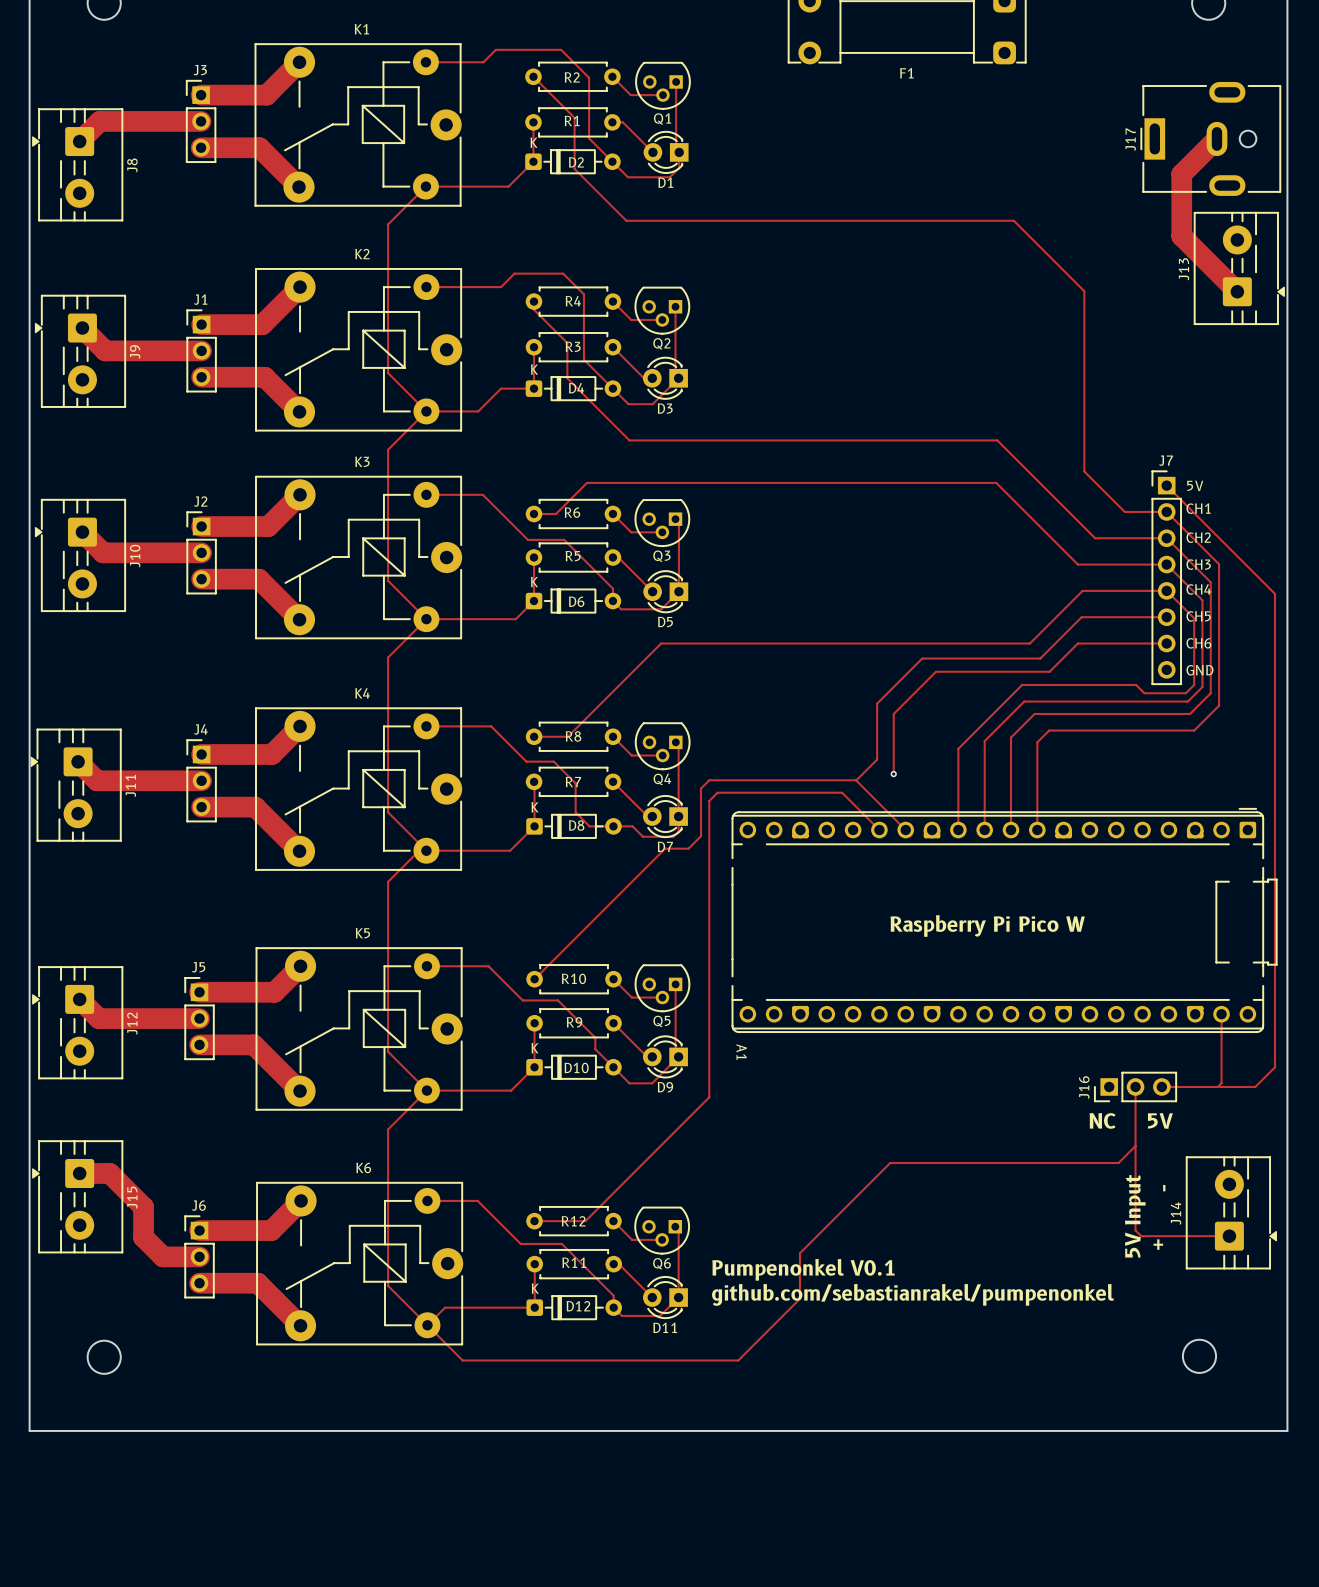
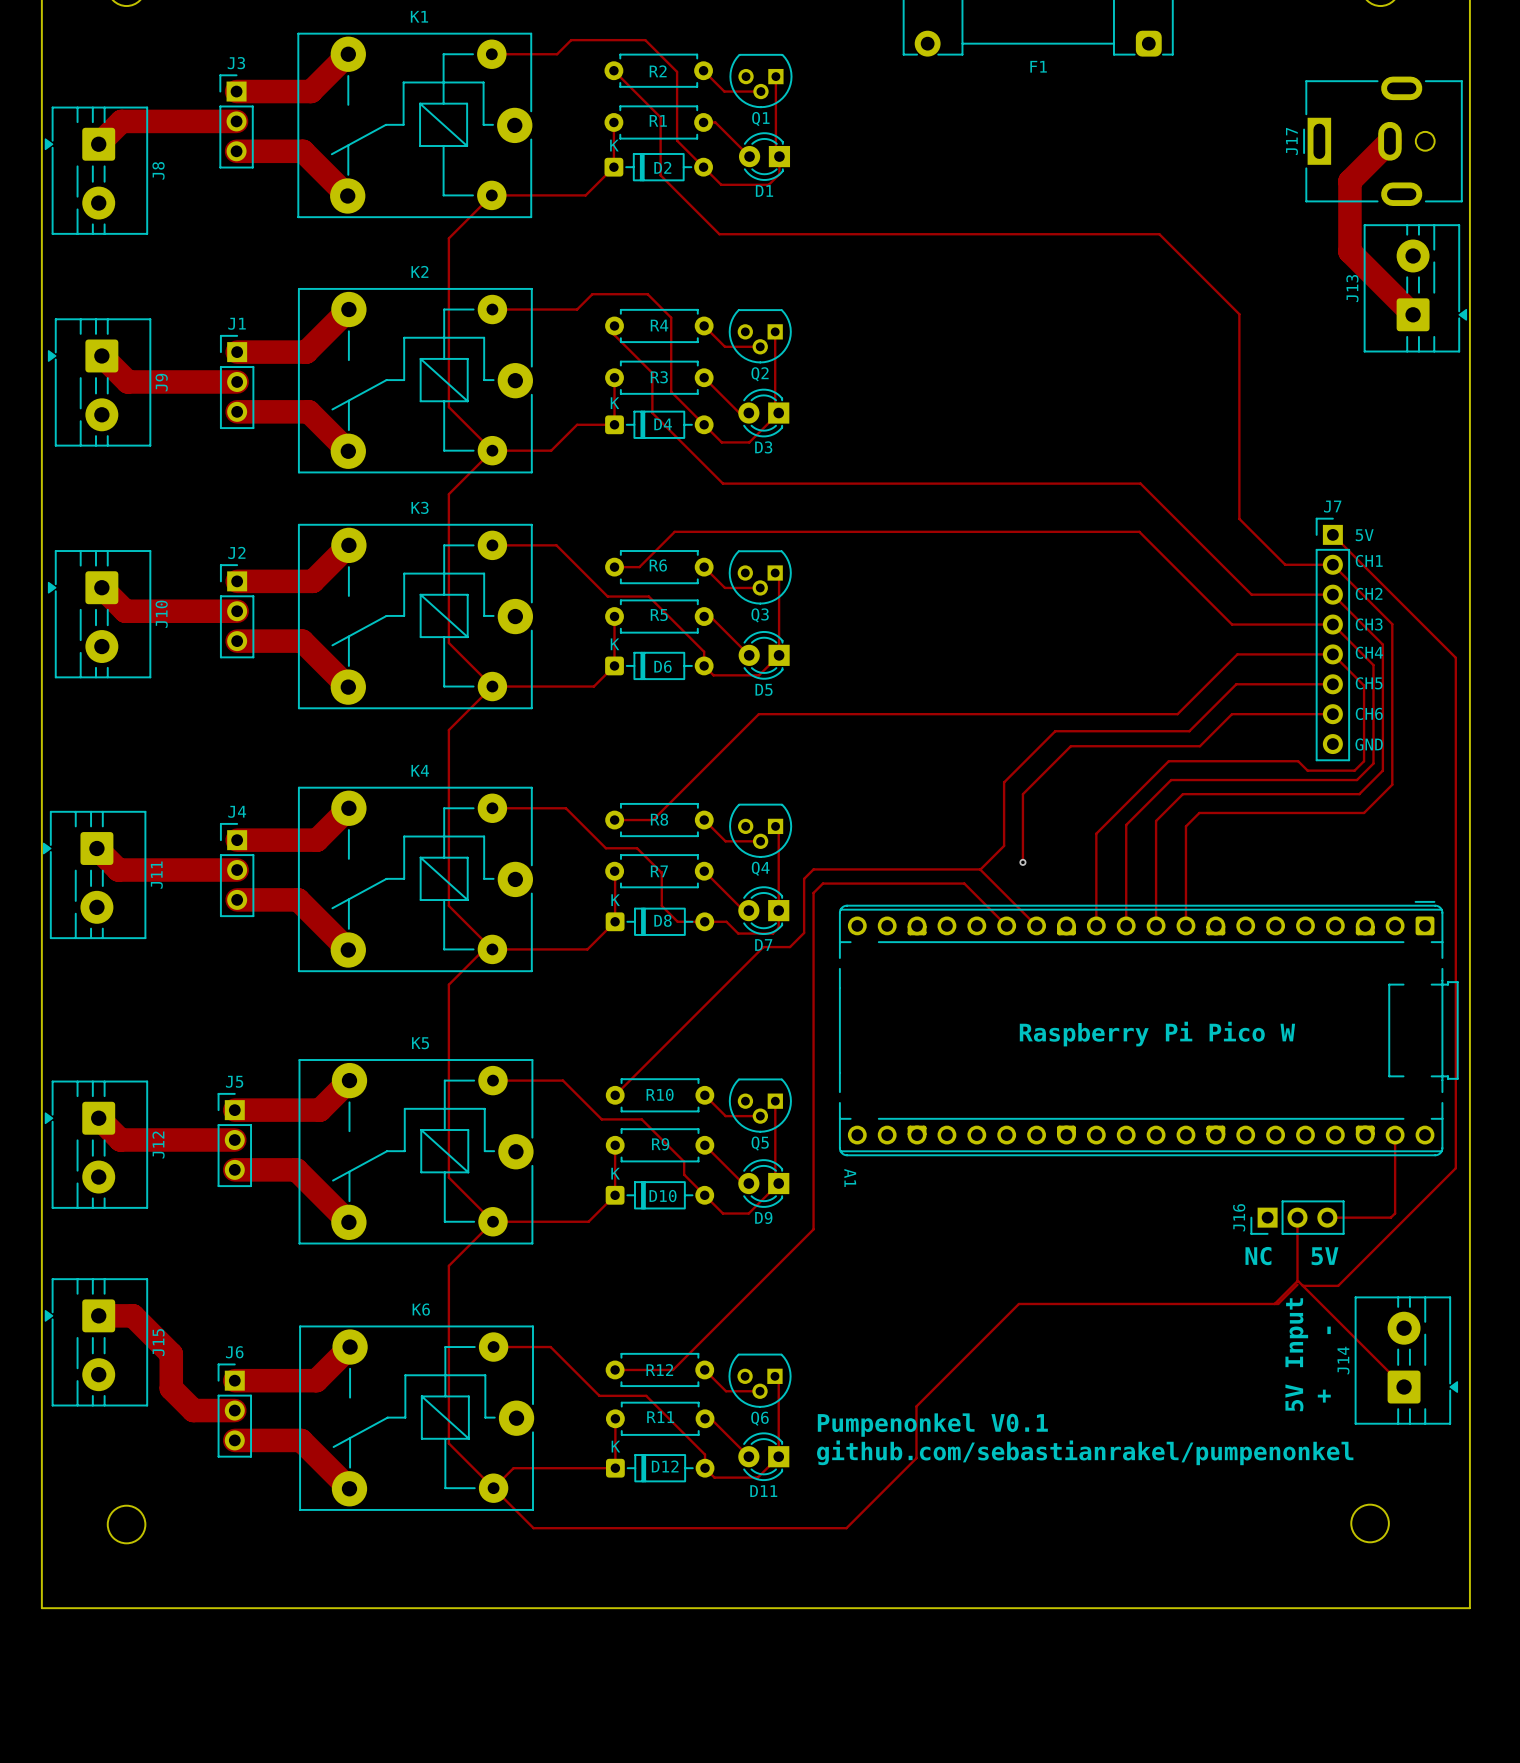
track: (1275, 1043) (1275, 1067) (1255, 1086) (1217, 1086) -> (1455, 1168) (1338, 1285) (1302, 1285)
track: (1135, 1142) (1135, 1230) (1141, 1236) (1229, 1236) -> (1274, 1303) (1298, 1281) (1404, 1387)

